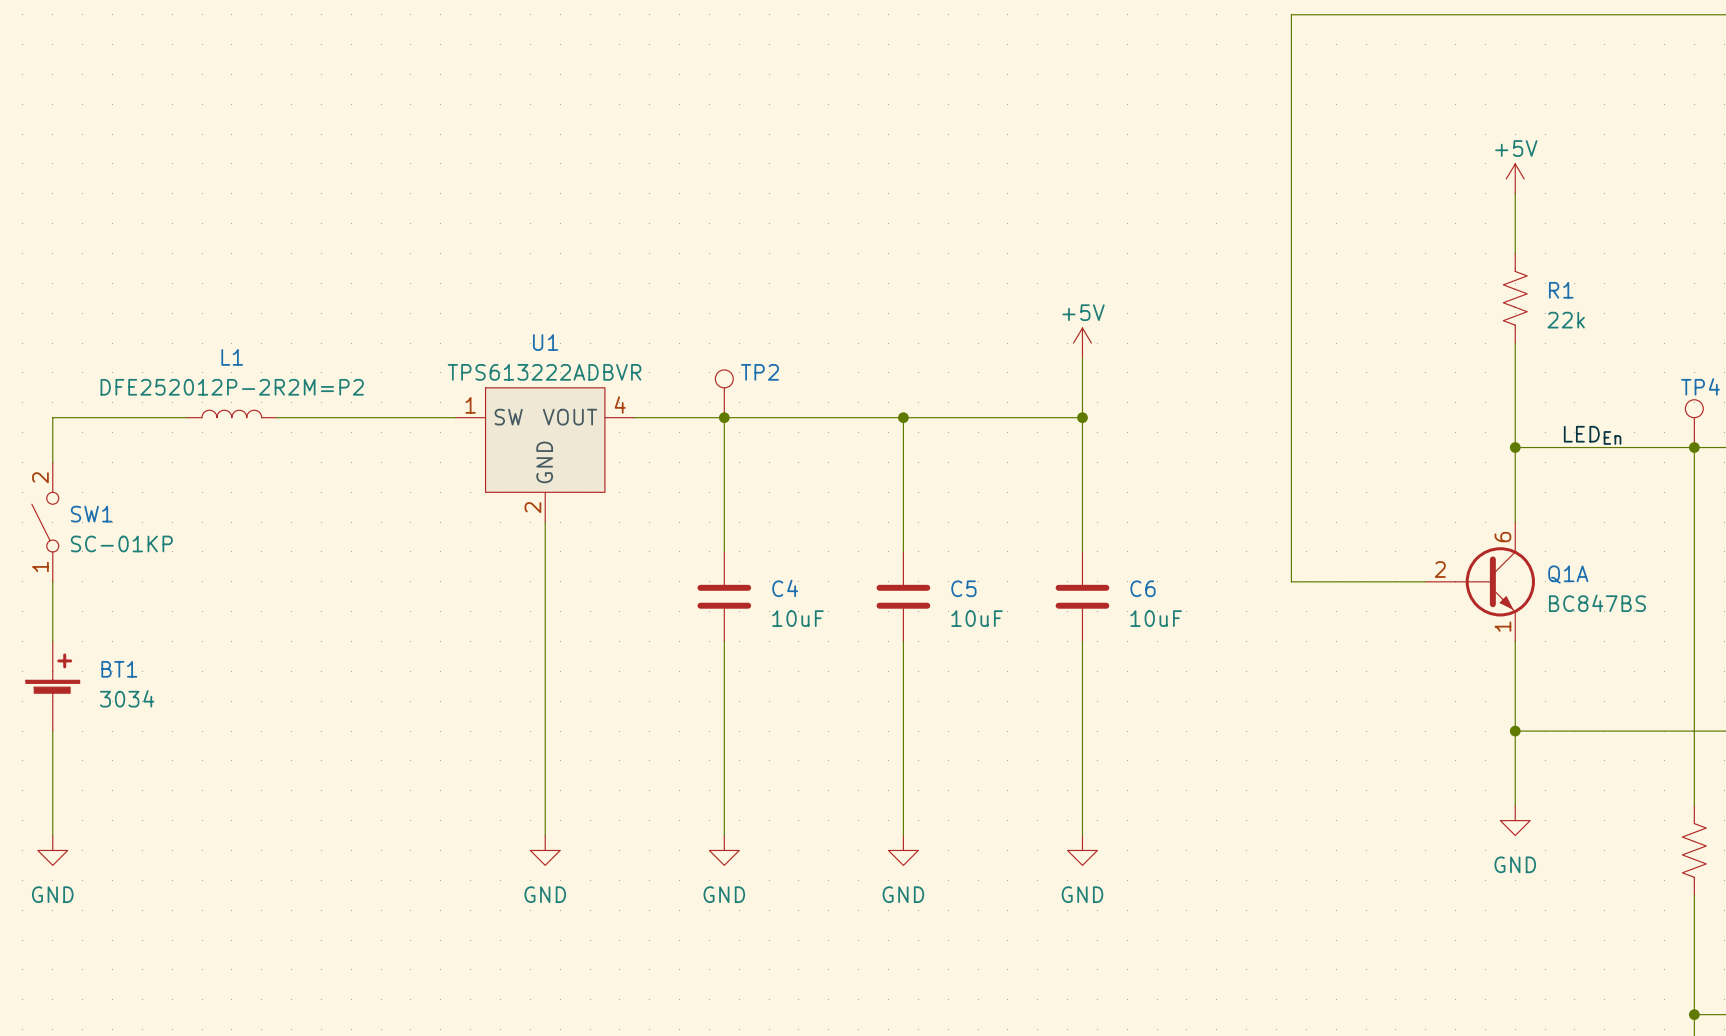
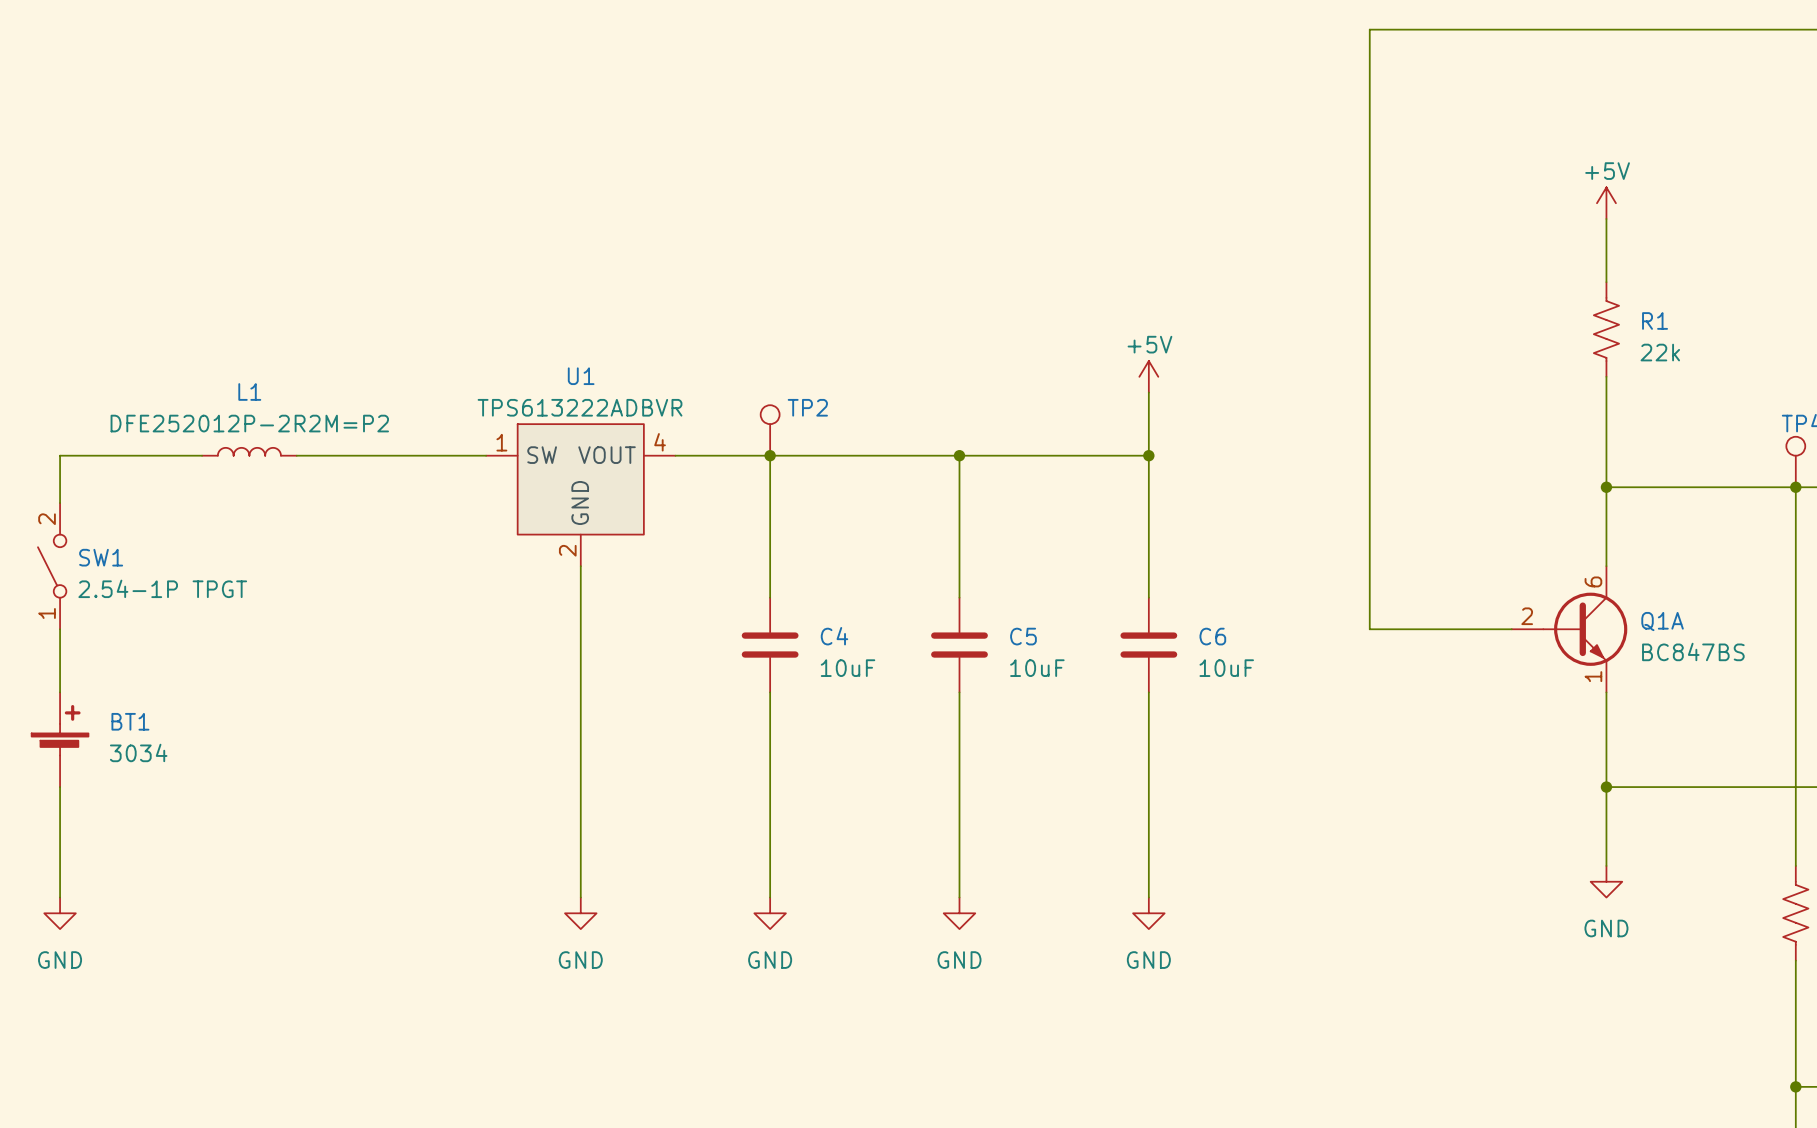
label: LEDEn (1592, 435) -> none
SW1 value: SC-01KP (121, 543) -> 2.54-1P TPGT (162, 588)

